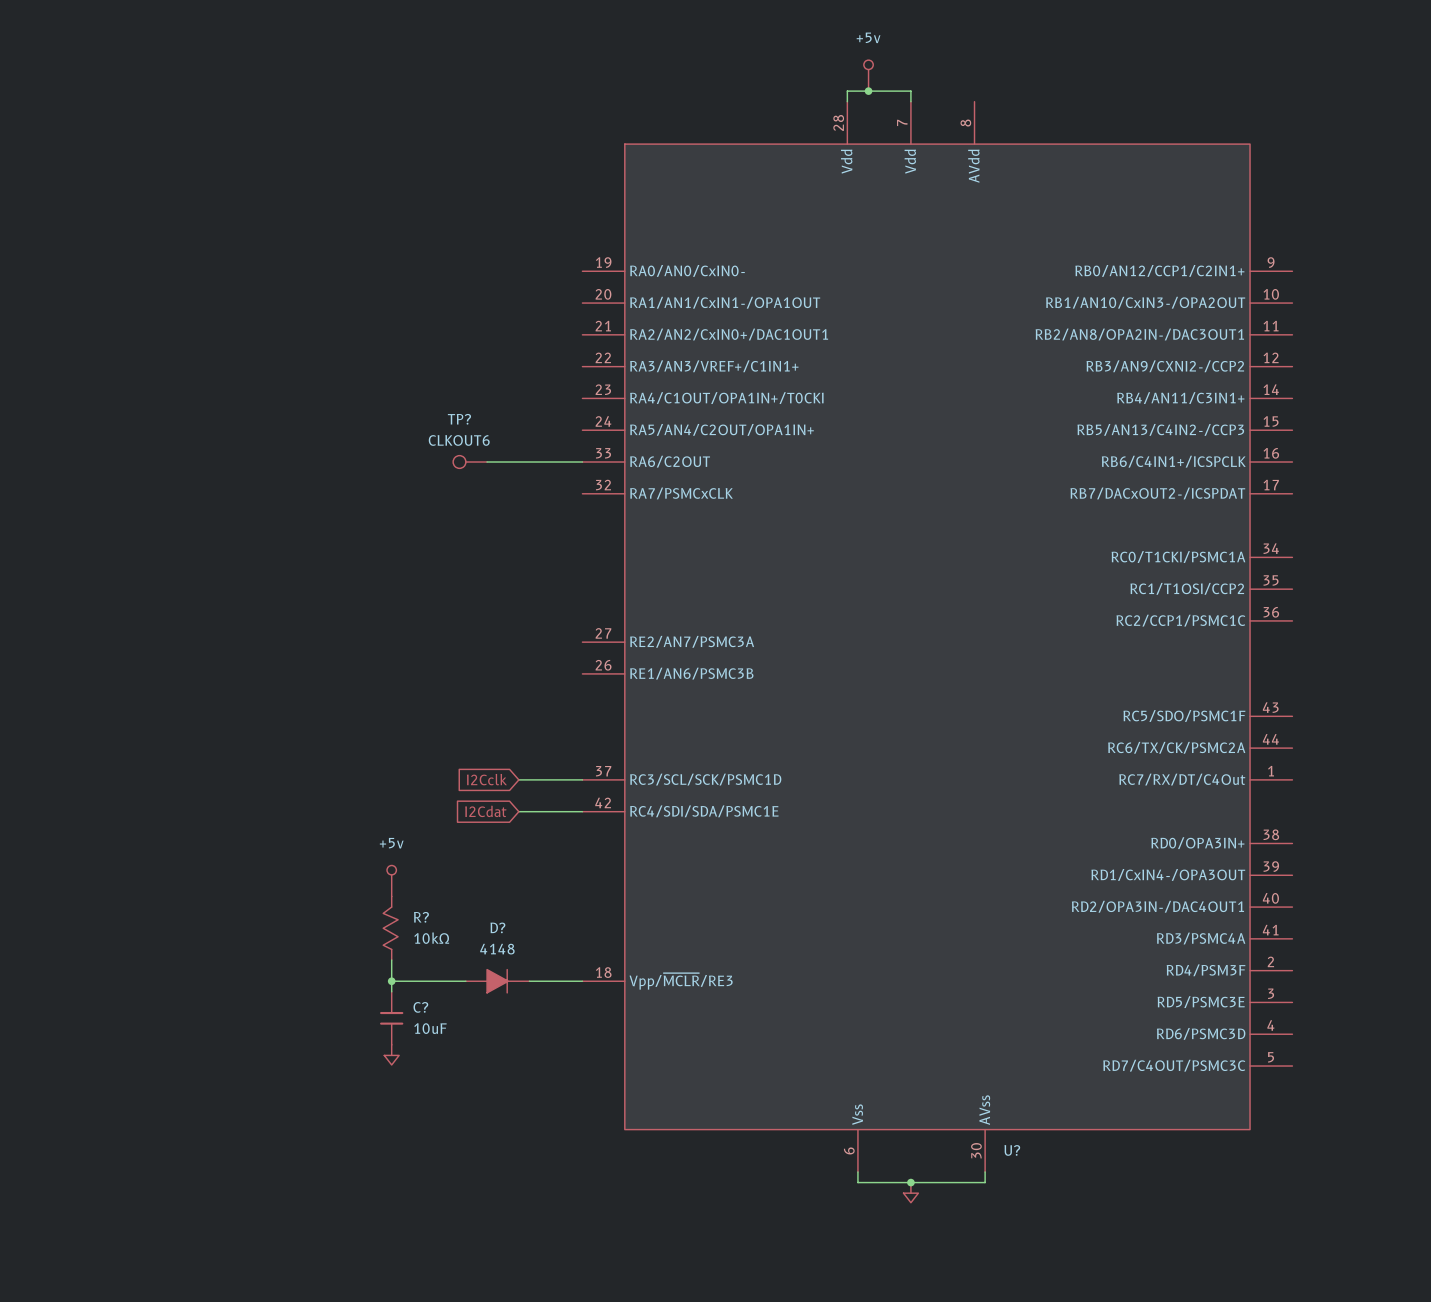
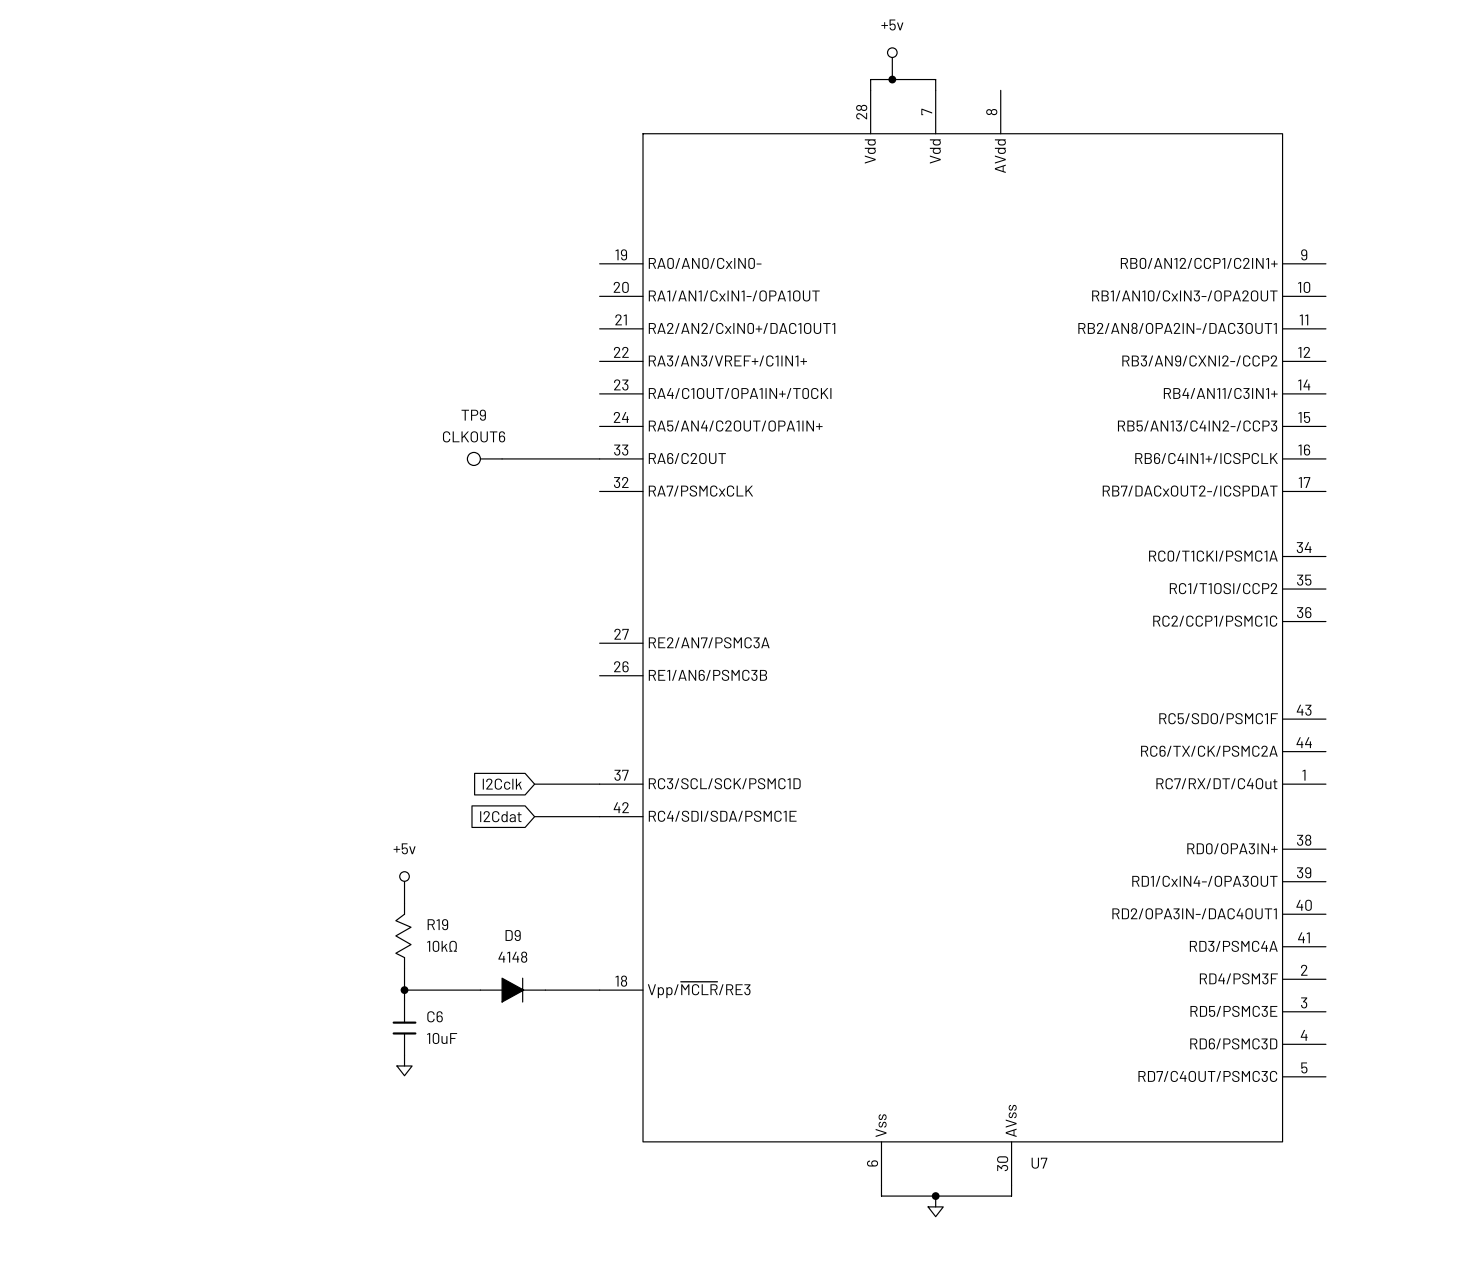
TP? name: TP? (459, 419) -> TP9 (473, 415)
R? name: R? (421, 917) -> R19 (437, 924)
D? name: D? (497, 927) -> D9 (513, 935)
C? name: C? (420, 1007) -> C6 (435, 1016)
U? name: U? (1012, 1150) -> U7 (1039, 1163)

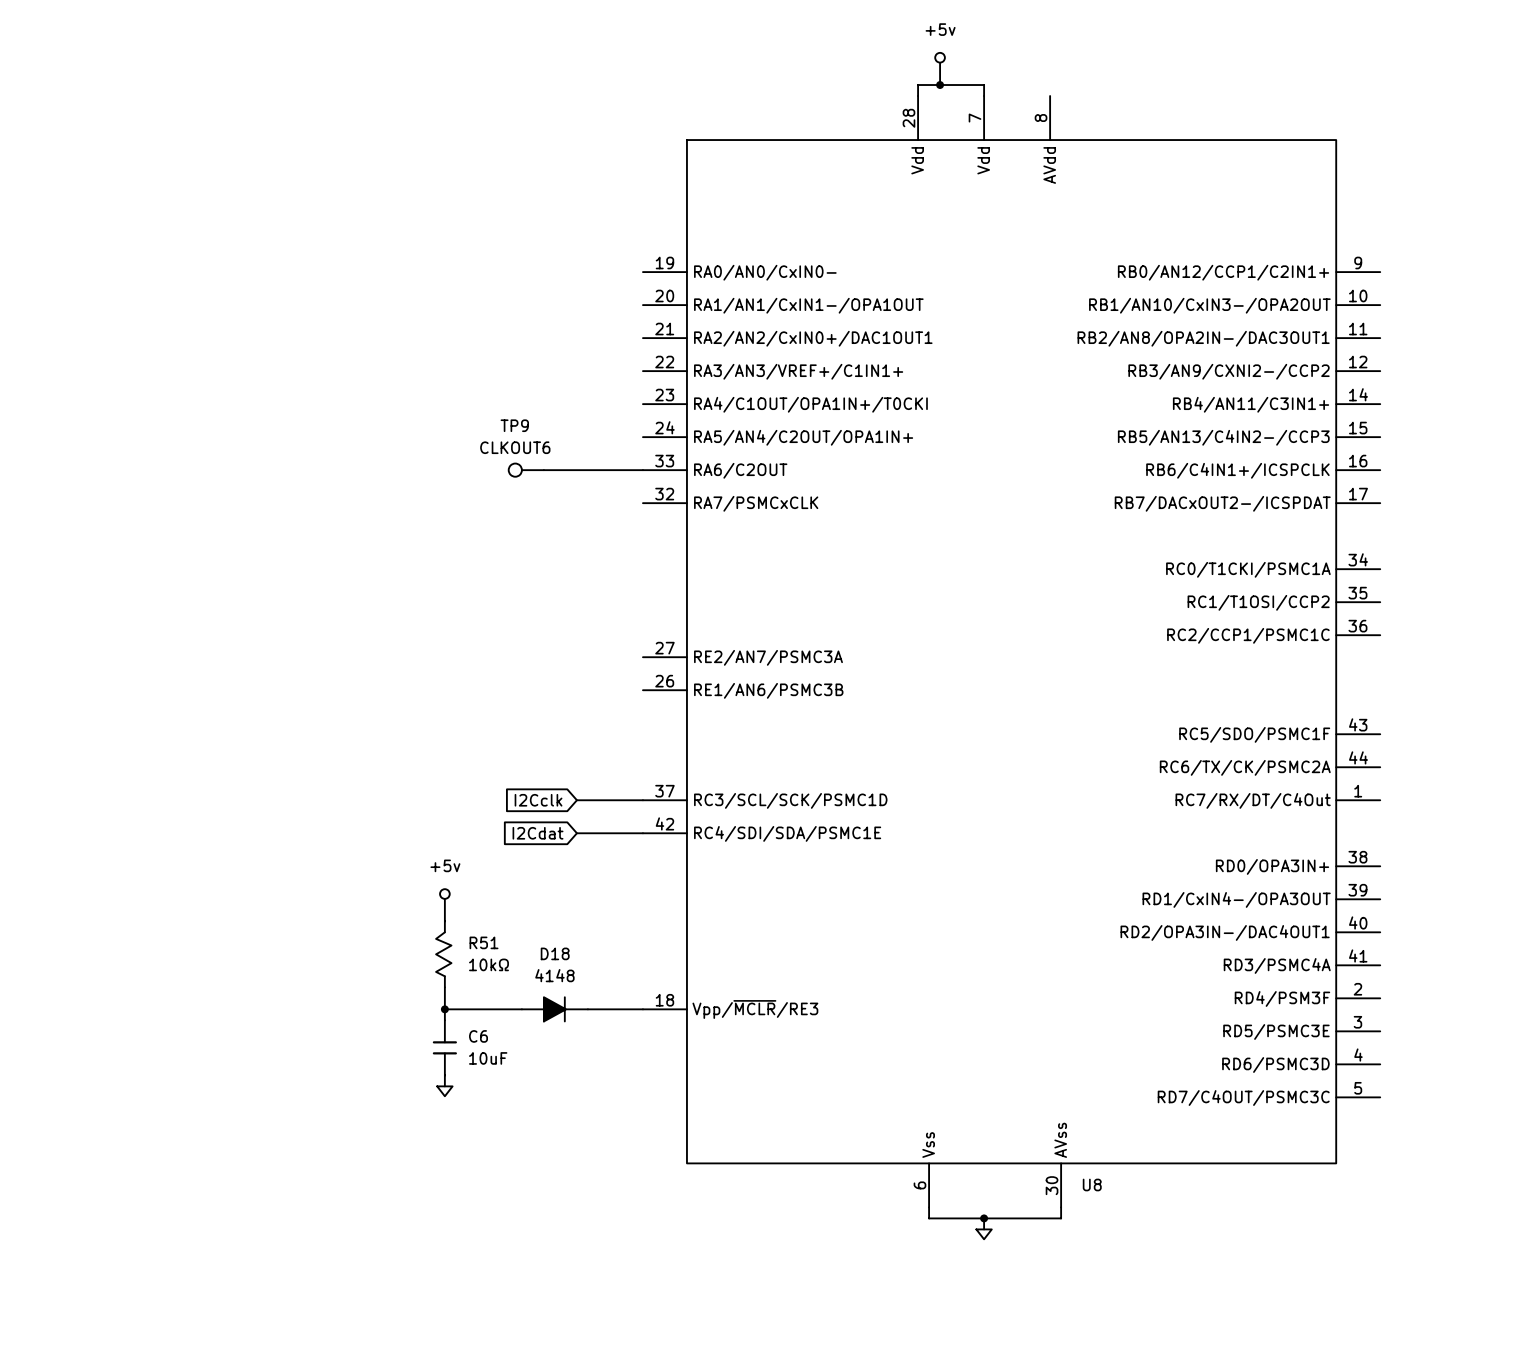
R19 name: R19 (437, 924) -> R51 (484, 942)
D9 name: D9 (513, 935) -> D18 (555, 953)
U7 name: U7 (1039, 1163) -> U8 (1092, 1184)

